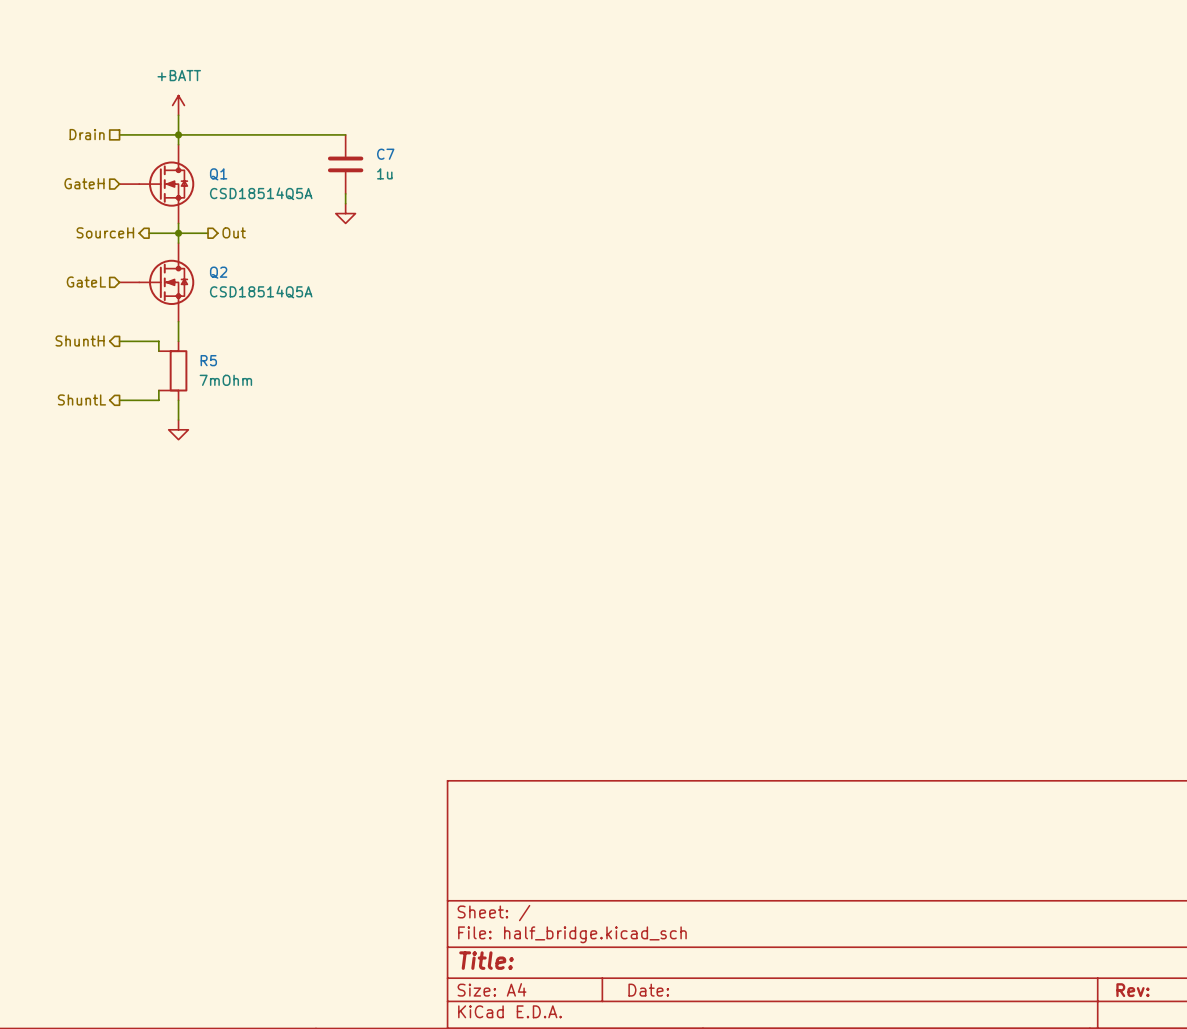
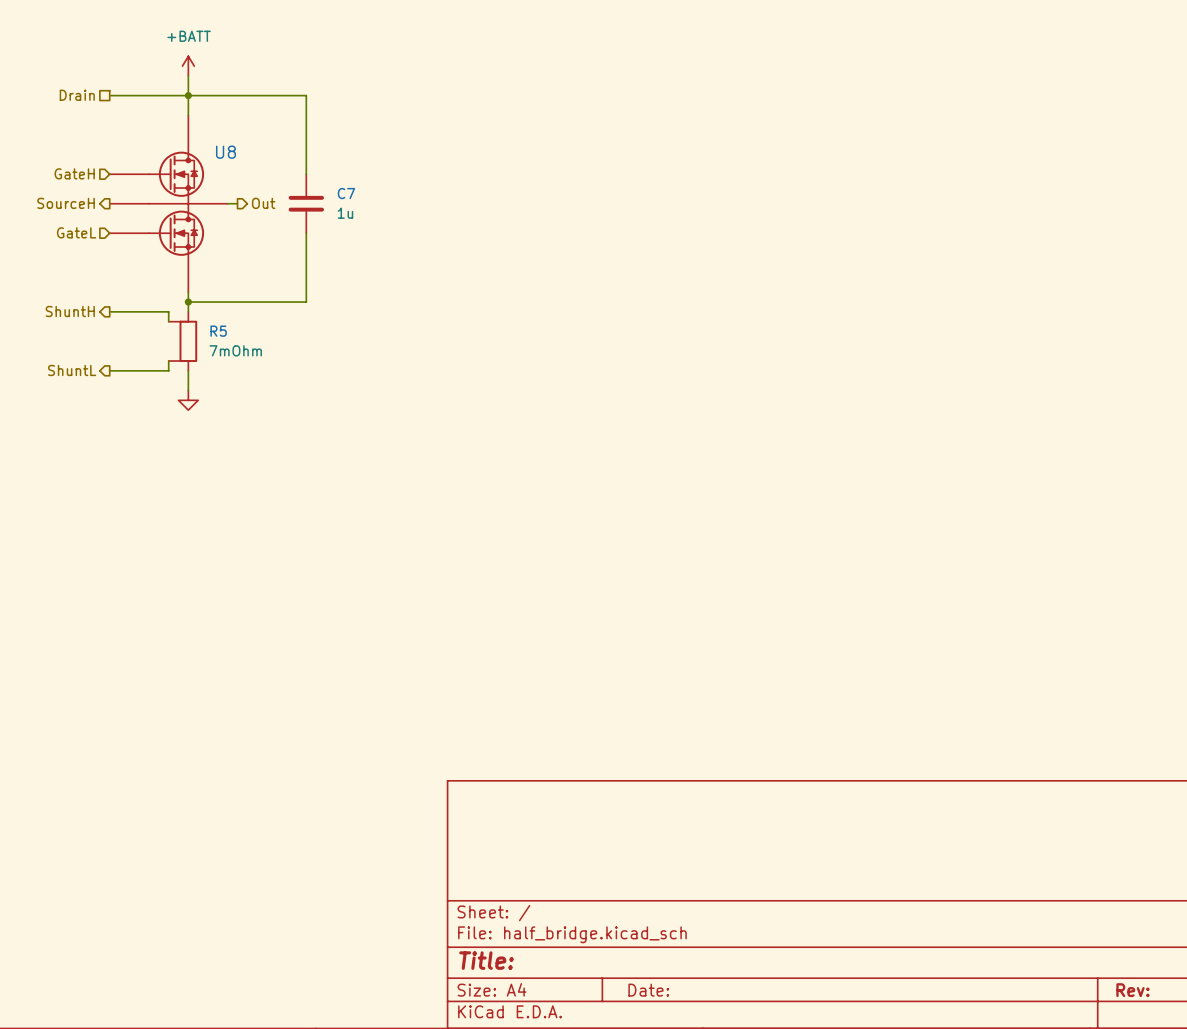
wire: none -> (188, 75) (188, 115)
wire: none -> (109, 95) (306, 95) (306, 174)
power symbol position: +BATT (178, 105) -> +BATT (188, 66)
wire: (178, 115) (178, 144) -> none
hierarchical label position: Drain (87, 134) -> Drain (77, 95)
wire: (119, 134) (345, 134) -> none
junction position: (178, 134) -> (188, 95)
C7 position: (345, 164) -> (306, 203)
hierarchical label position: GateH (84, 183) -> GateH (74, 173)
Q1: CSD18514Q5A (156, 184) -> none
wire: (345, 193) (345, 203) -> none
U8: none -> (168, 203)
wire: none -> (227, 203) (237, 203)
power symbol: (345, 213) -> none
wire: (178, 223) (178, 243) -> none
hierarchical label position: SourceH (105, 232) -> SourceH (66, 203)
hierarchical label position: Out (234, 232) -> Out (263, 203)
junction: (178, 233) -> none
wire: none -> (306, 233) (306, 302) (188, 302)
hierarchical label position: GateL (86, 282) -> GateL (76, 232)
Q2: CSD18514Q5A (156, 282) -> none
junction: none -> (188, 302)
wire: none -> (109, 311) (168, 311) (168, 321)
wire: (178, 321) (178, 341) -> (188, 292) (188, 311)
hierarchical label position: ShuntH (80, 340) -> ShuntH (70, 311)
wire: (119, 341) (158, 341) (158, 351) -> none
wire: none -> (168, 361) (168, 370) (109, 370)
R5 position: (173, 370) -> (182, 341)
wire: (158, 390) (158, 400) (119, 400) -> none
hierarchical label position: ShuntL (81, 399) -> ShuntL (72, 370)
wire: (178, 400) (178, 419) -> (188, 370) (188, 390)
power symbol position: (178, 429) -> (188, 400)

